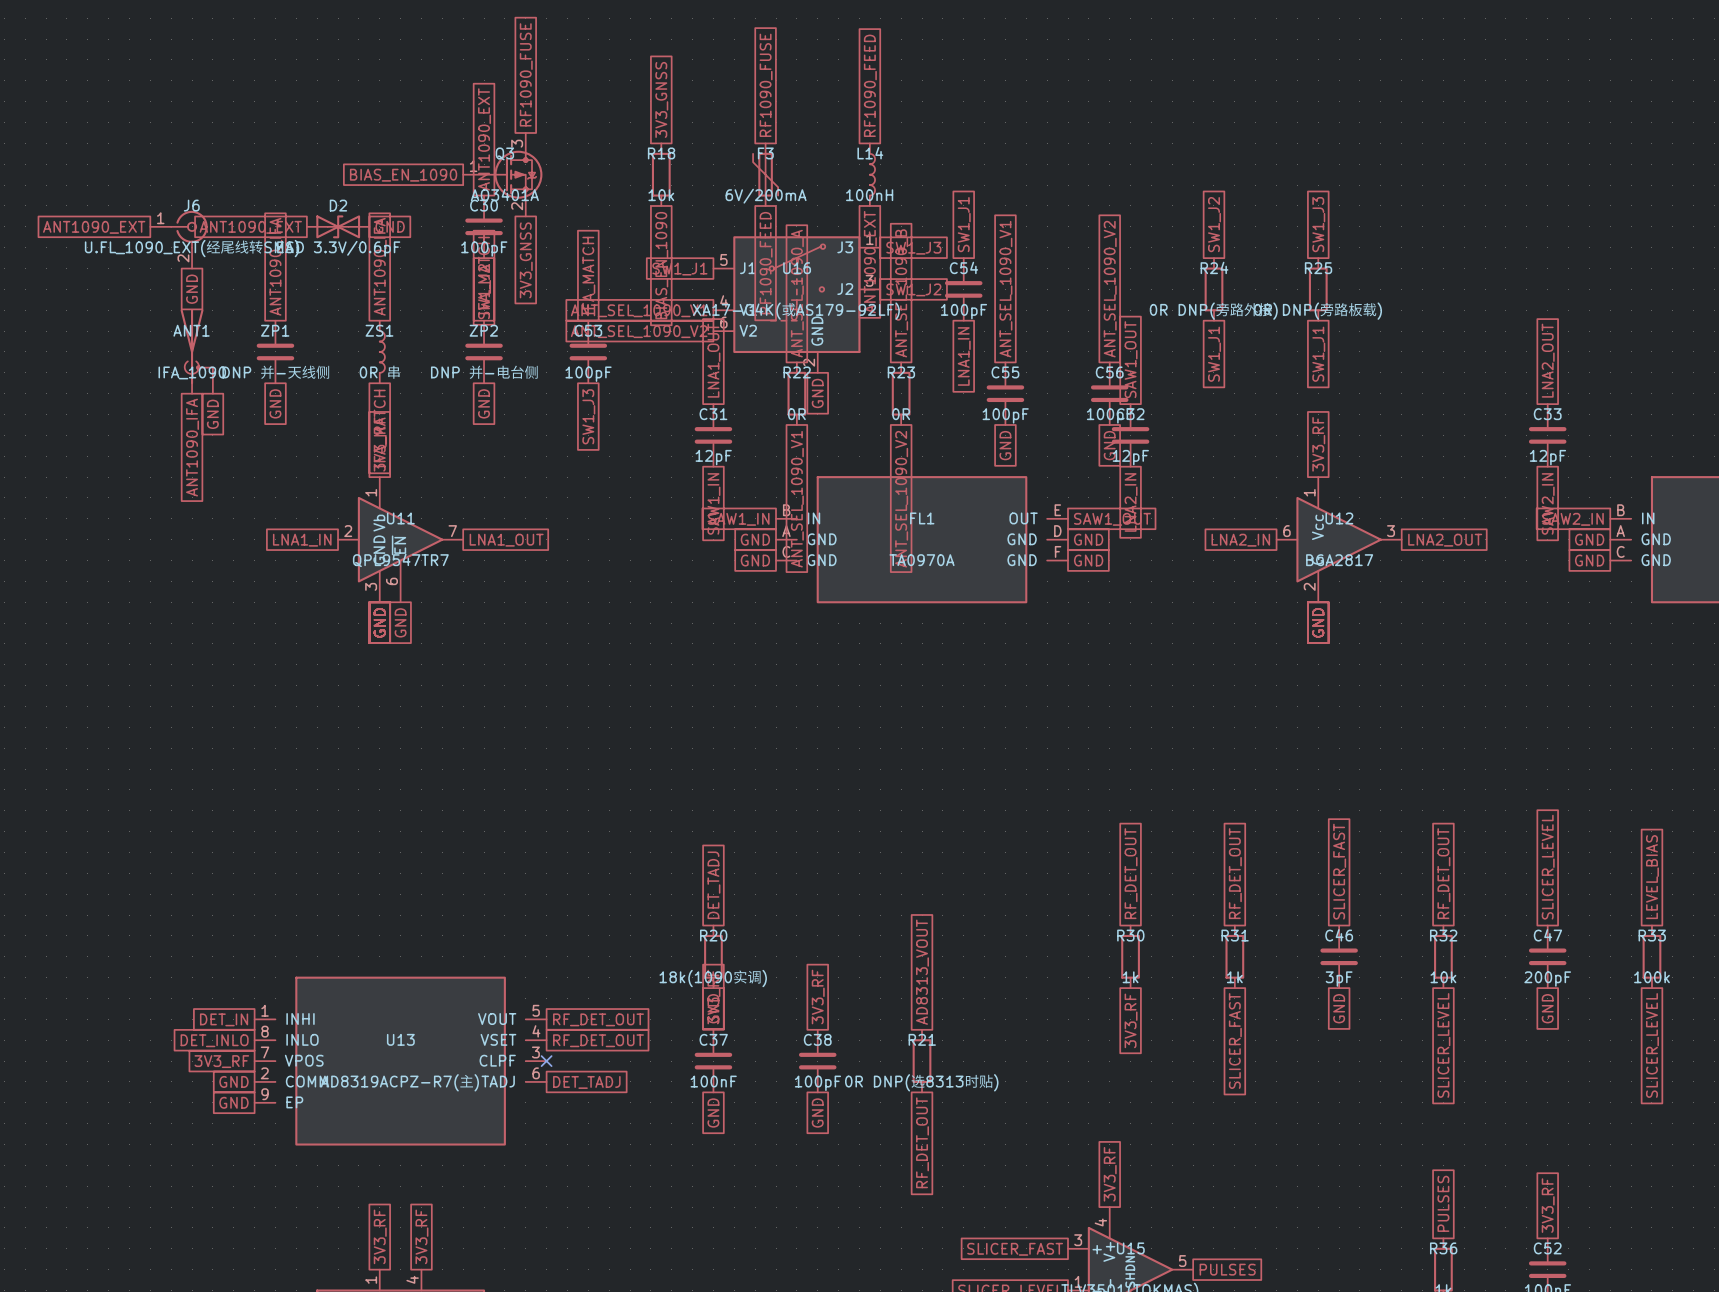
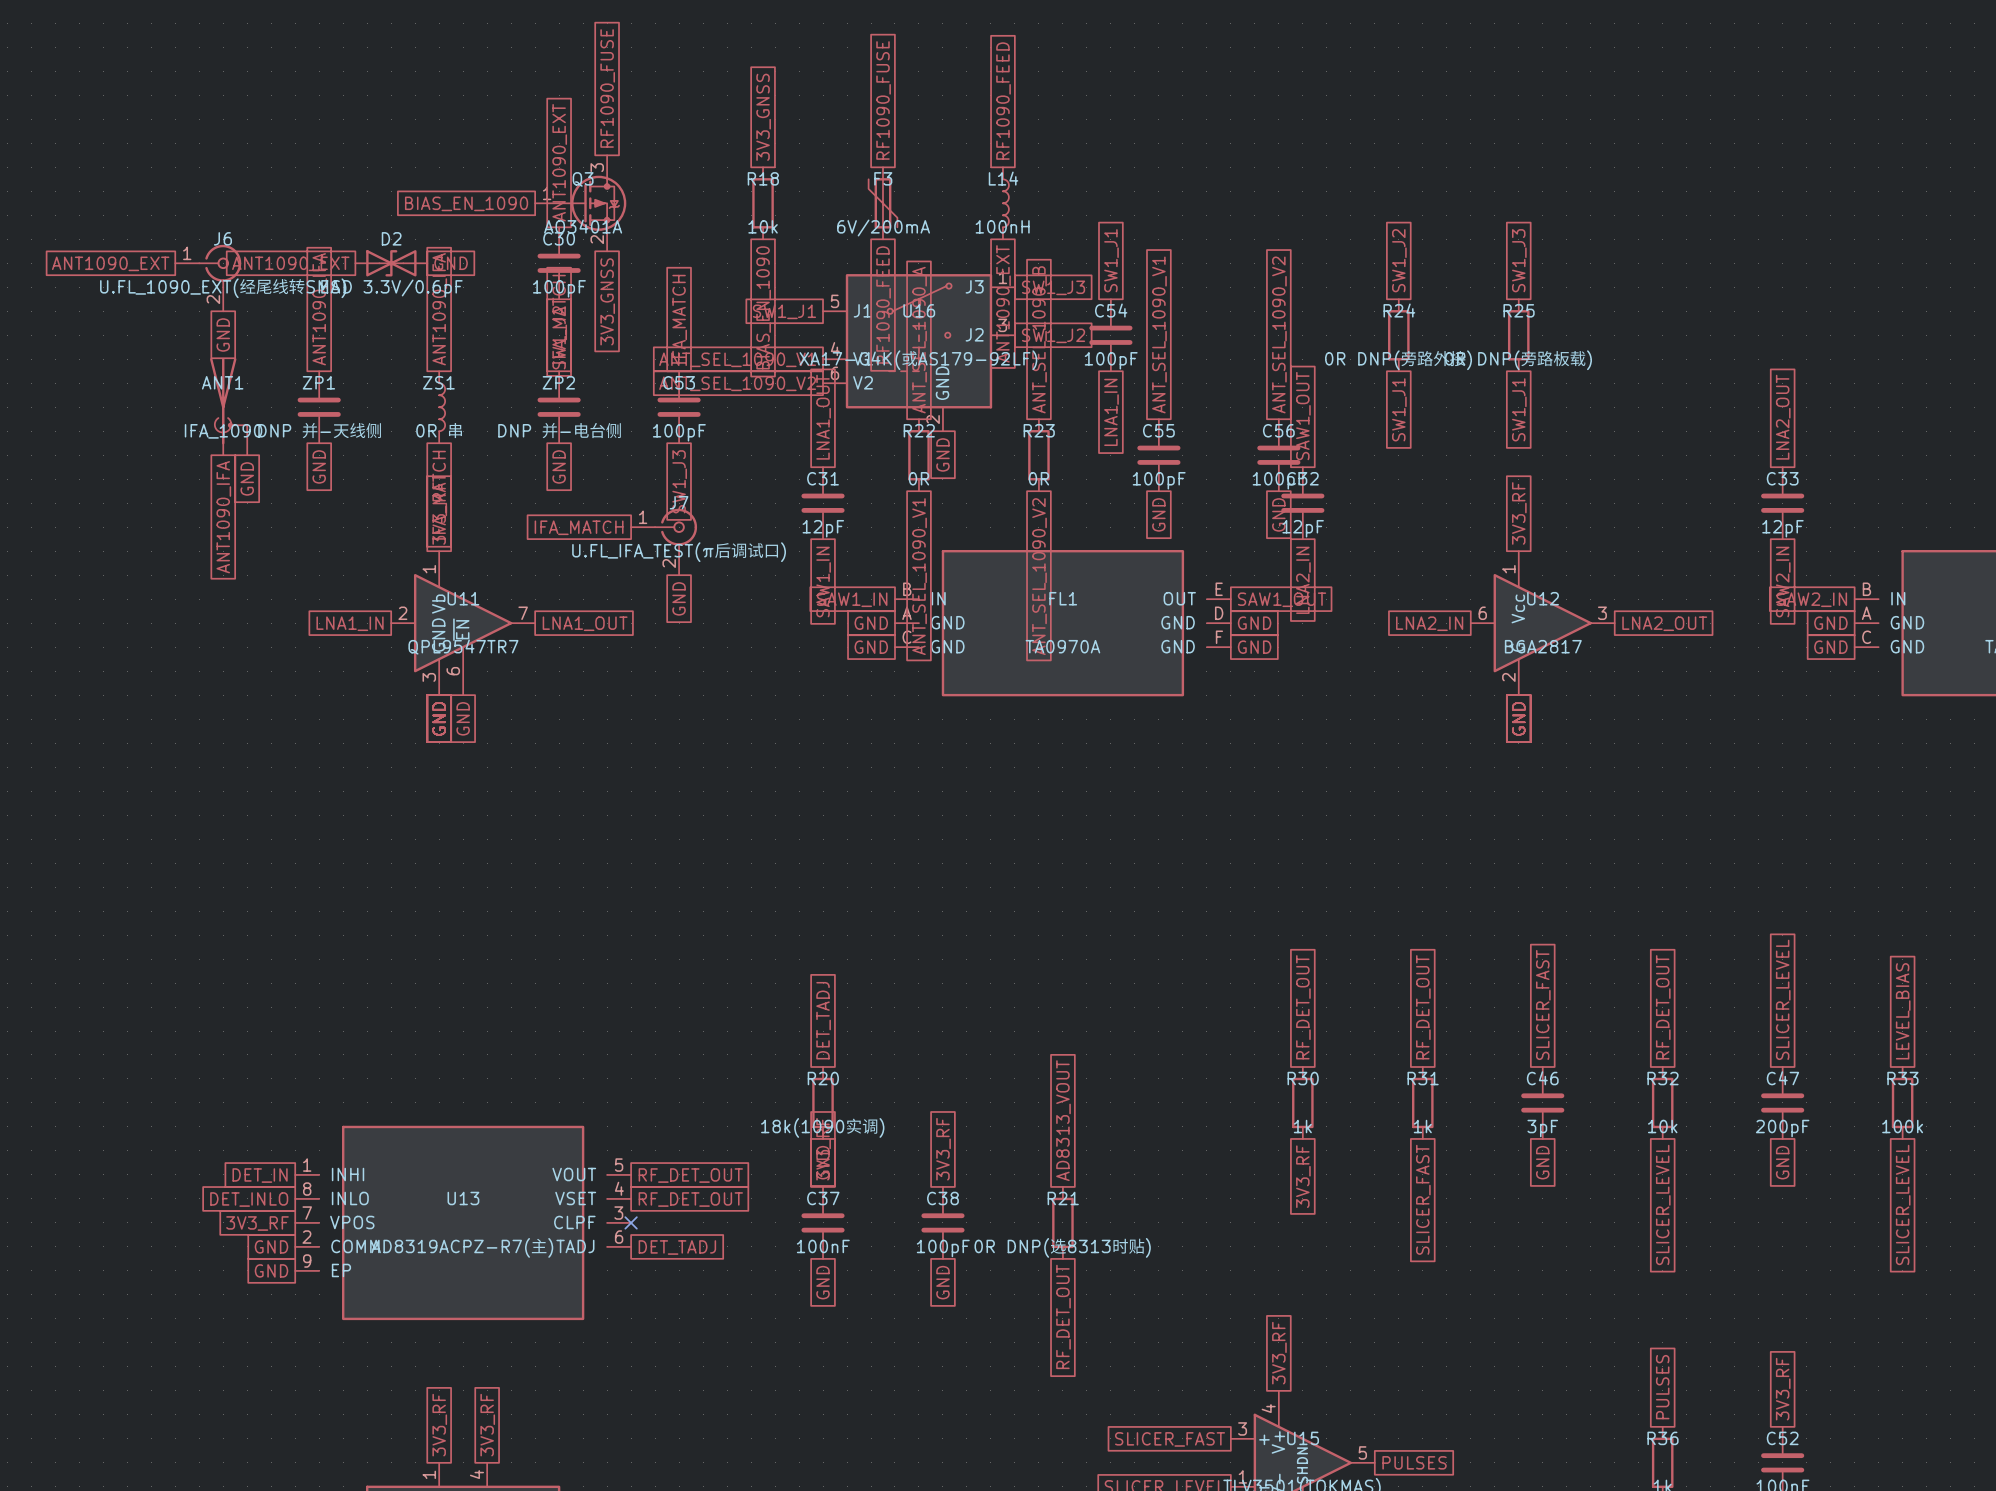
global label: none -> IFA_MATCH (579, 527)
J7: none -> U.FL_IFA_TEST(π后调试口) (664, 541)
global label: none -> GND (679, 598)

